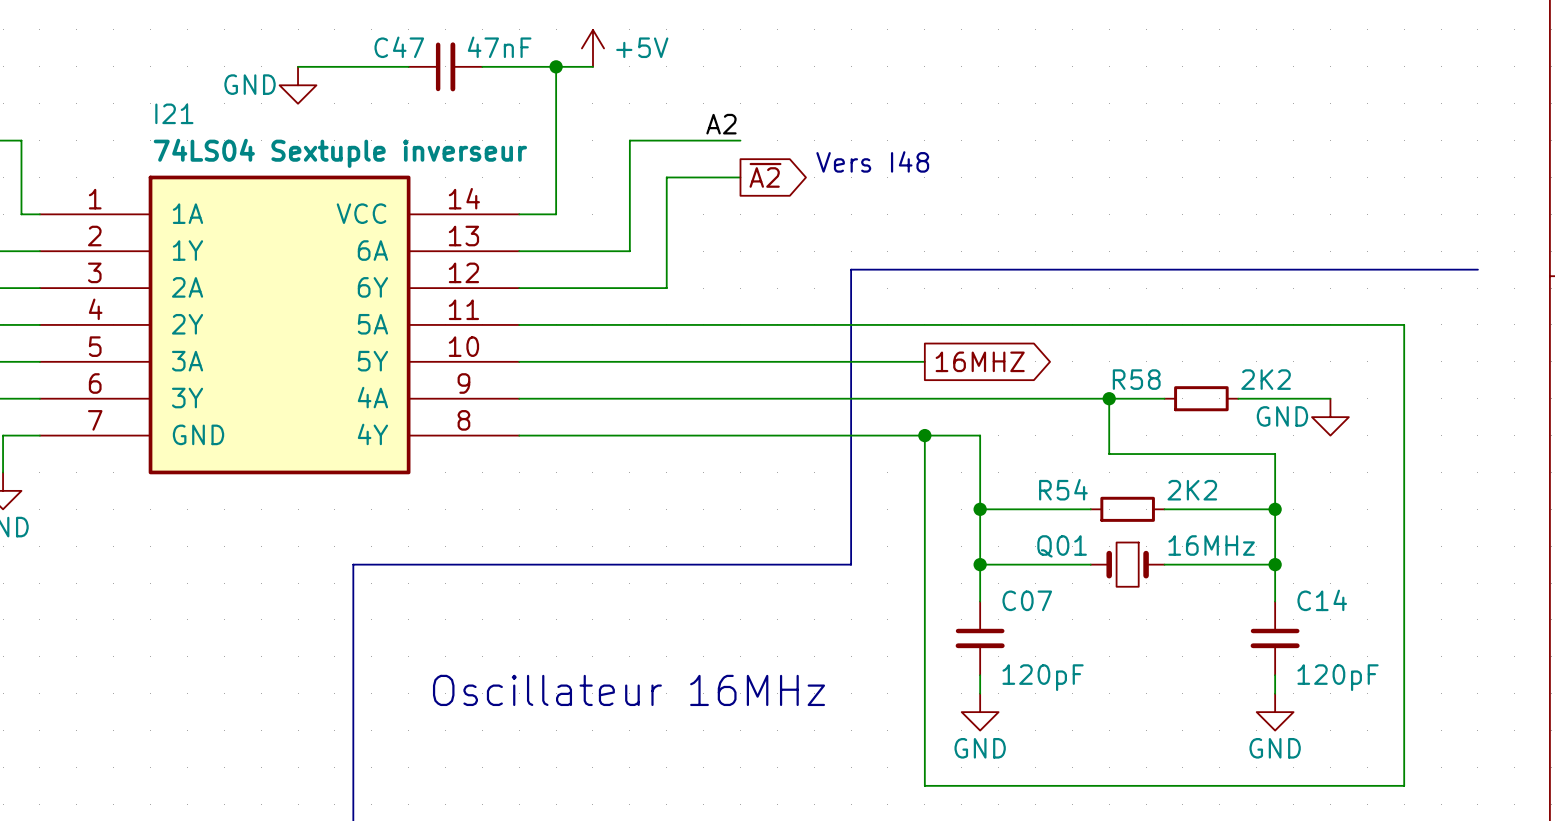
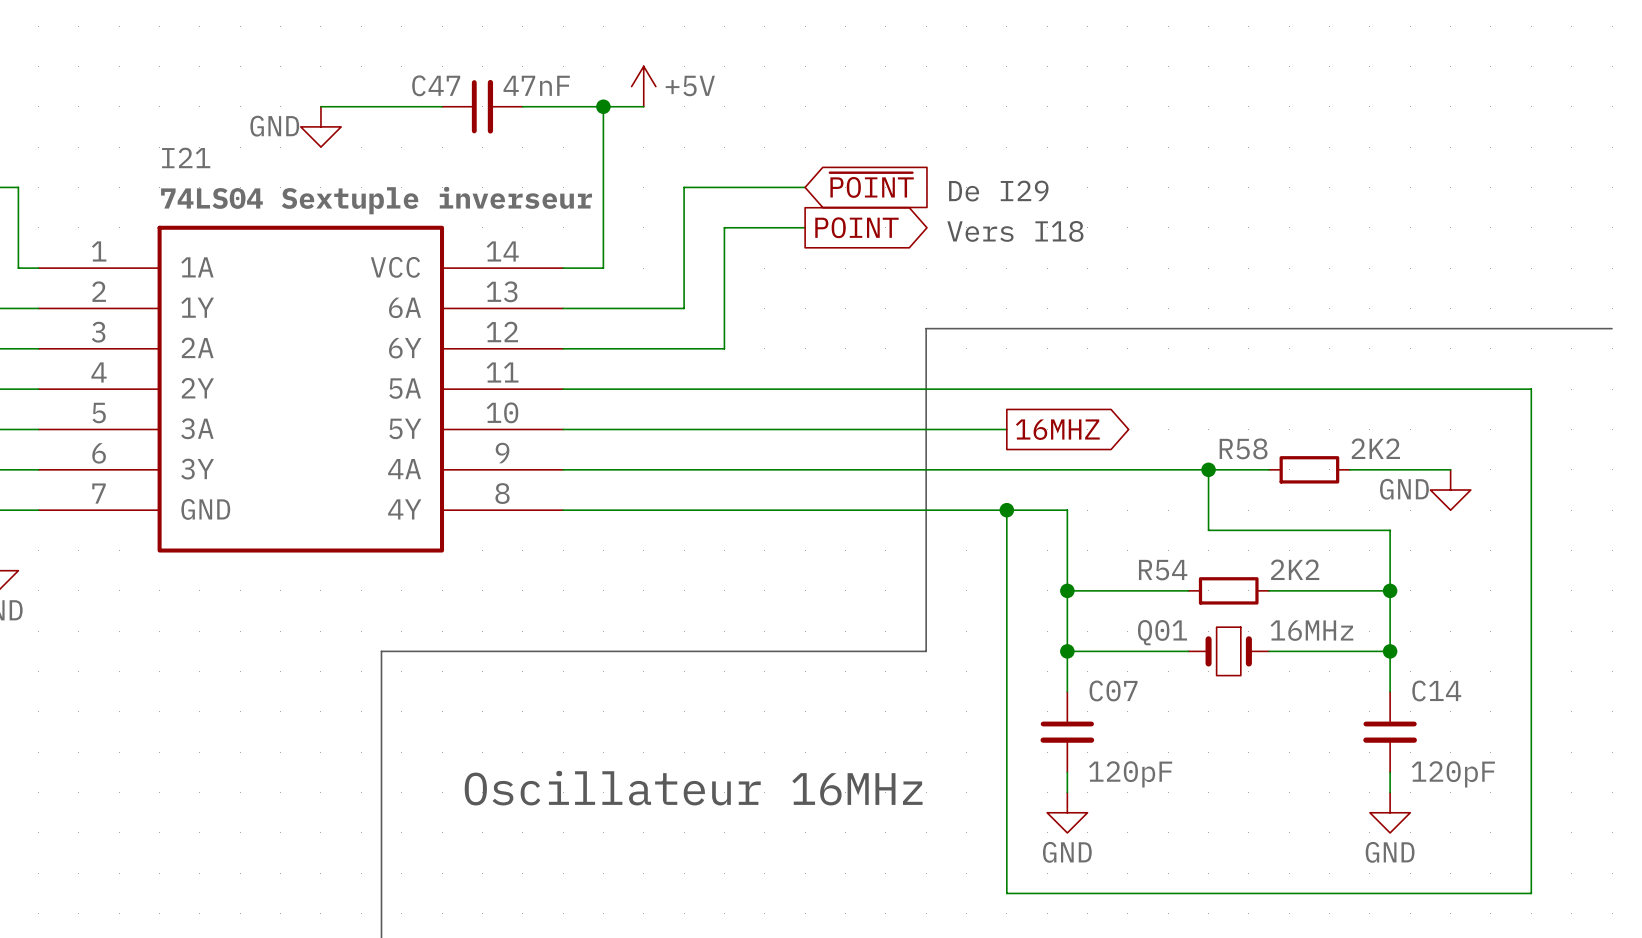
label: A2 (721, 124) -> none
global label: none -> ~{POINT} (871, 185)
text: none -> De I29 (998, 191)
text: Vers I48 (872, 161) -> Vers I18 (1015, 231)
global label: ~{A2} (765, 175) -> POINT (856, 227)

